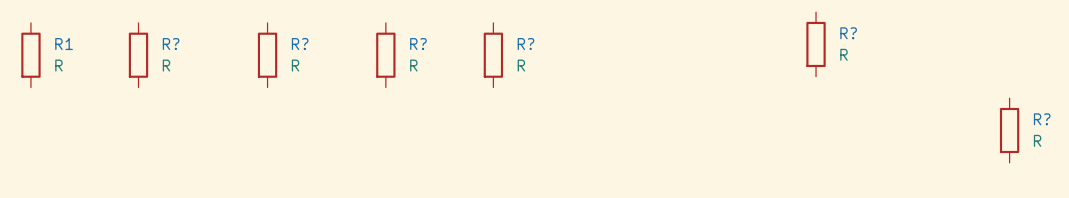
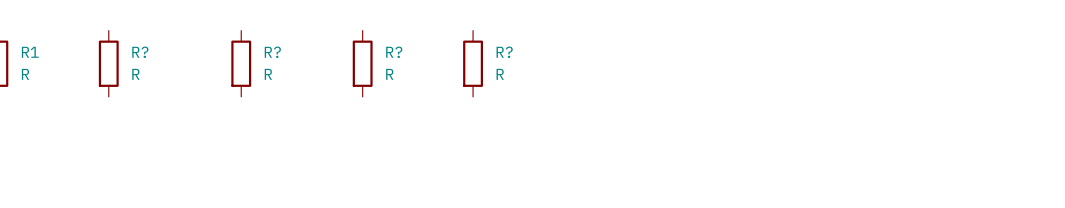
R?: R (816, 44) -> none
R?: R (1009, 130) -> none

